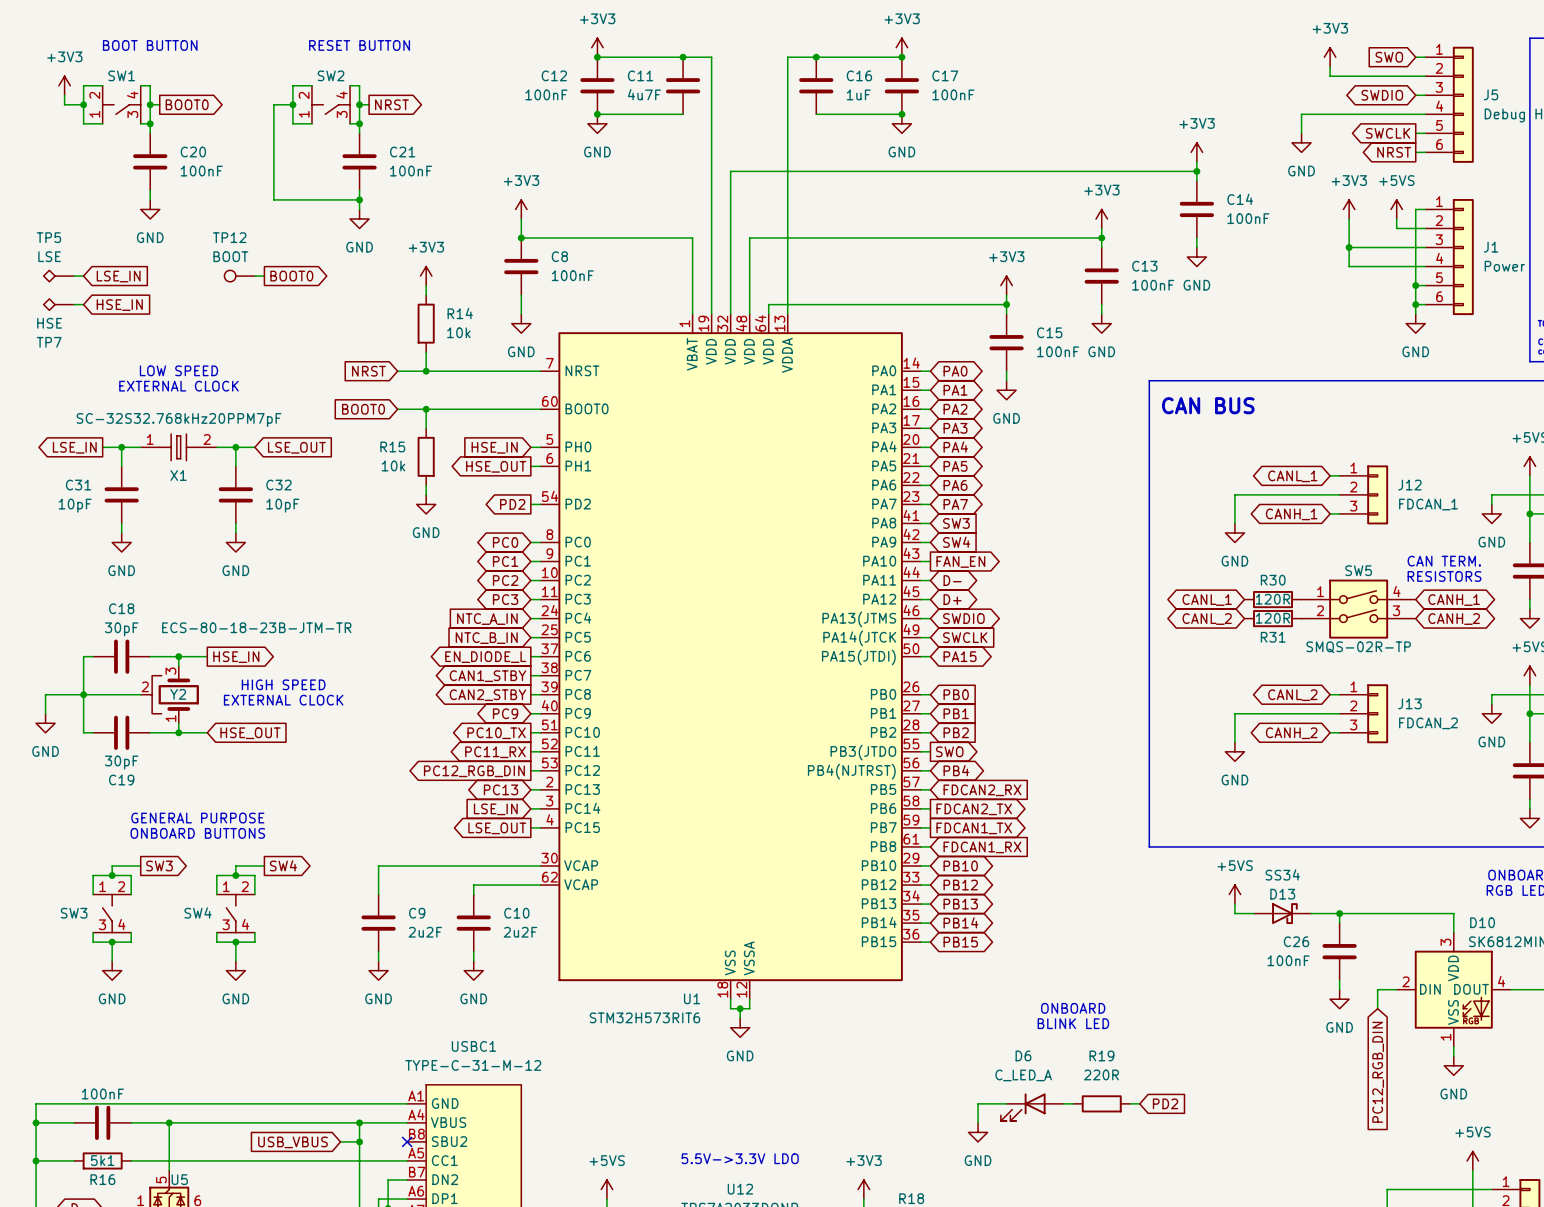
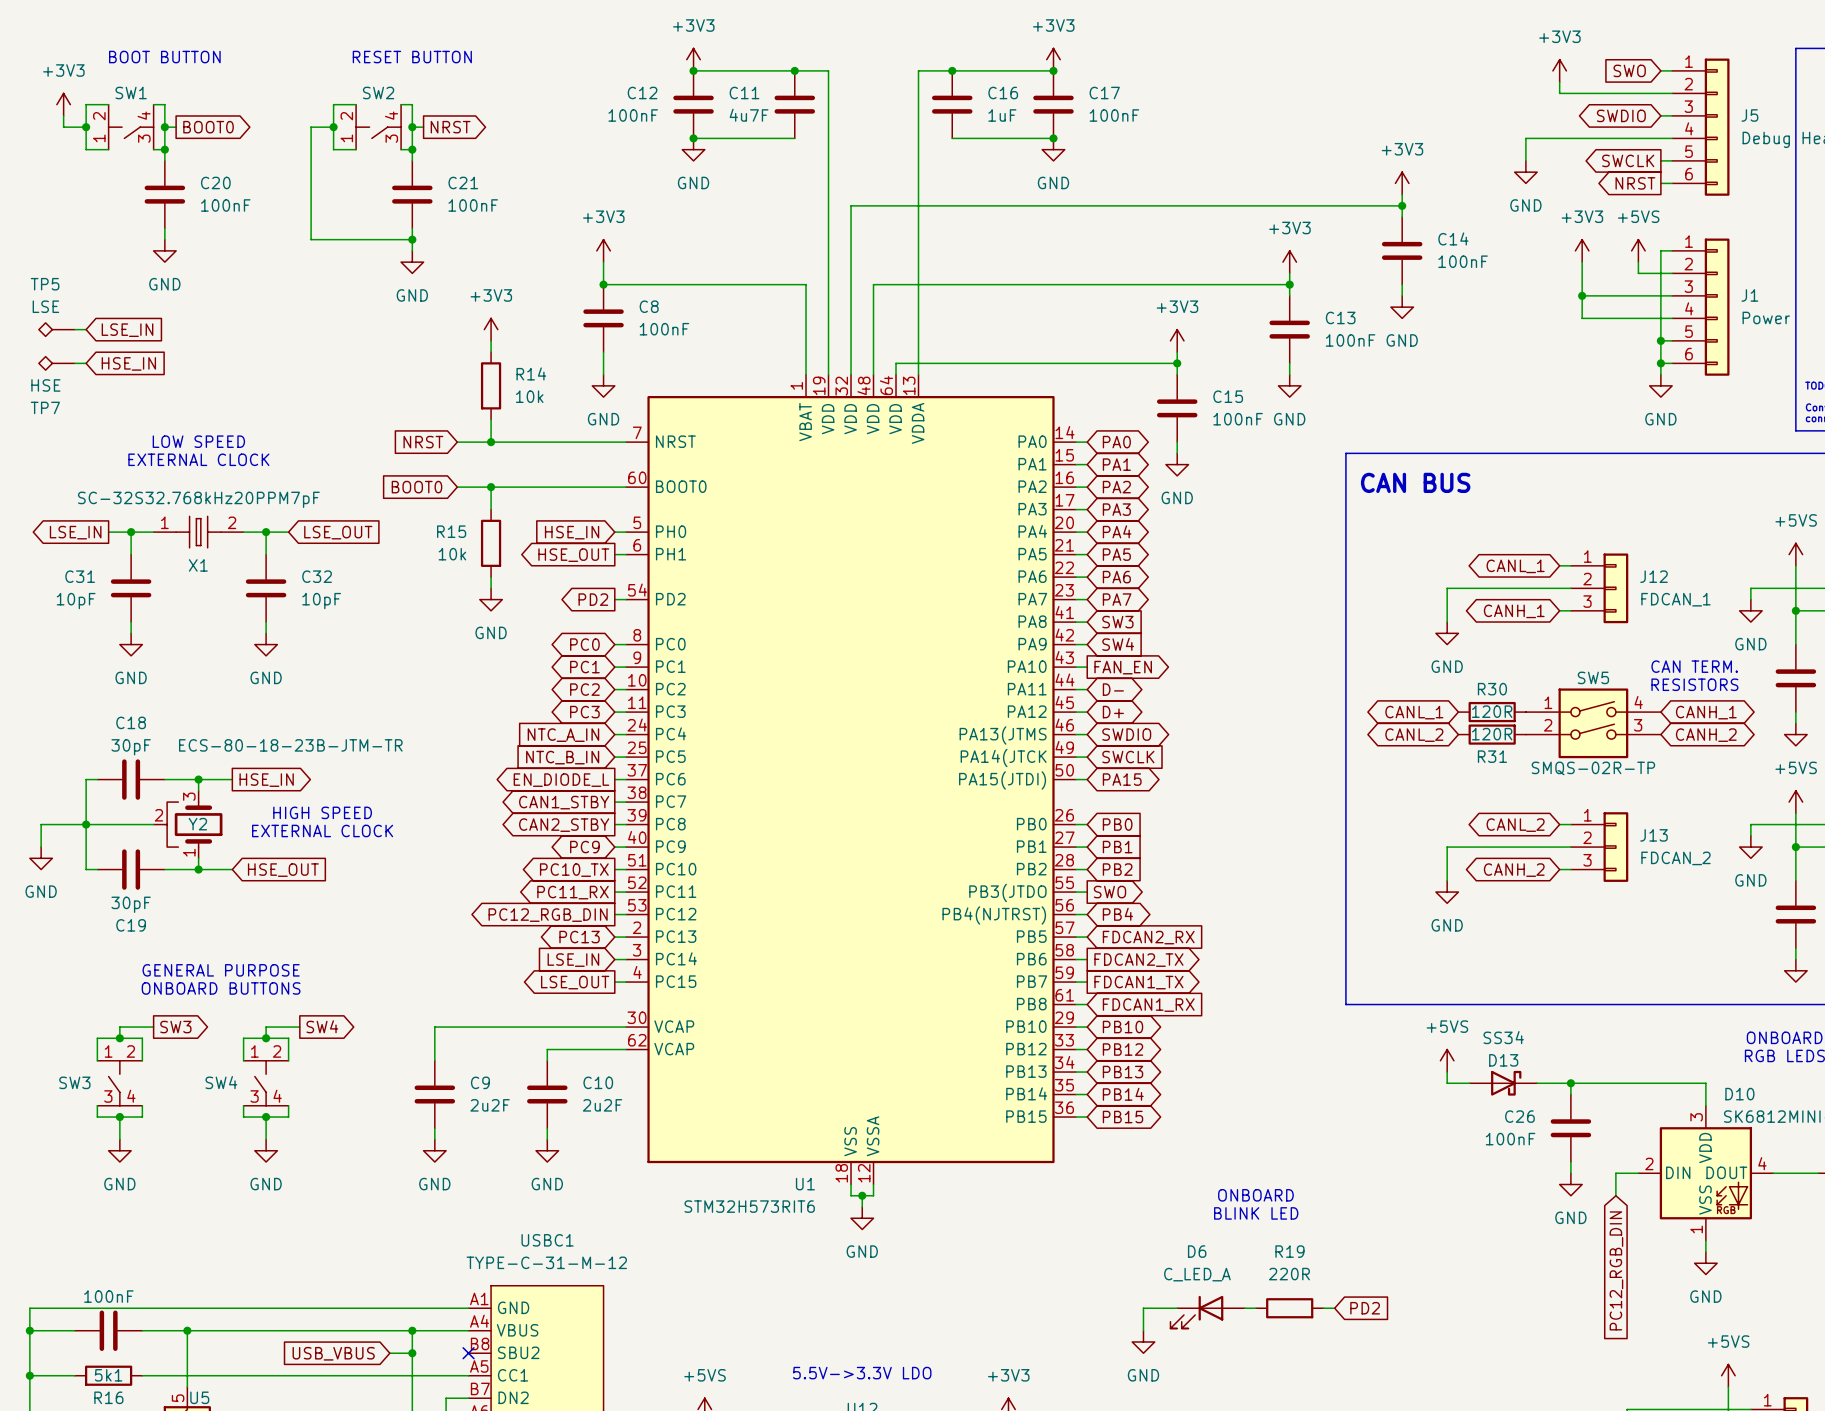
TP12: BOOT (239, 276) -> none
wire: (254, 276) (264, 276) -> none
global label: BOOT0 (291, 276) -> none

